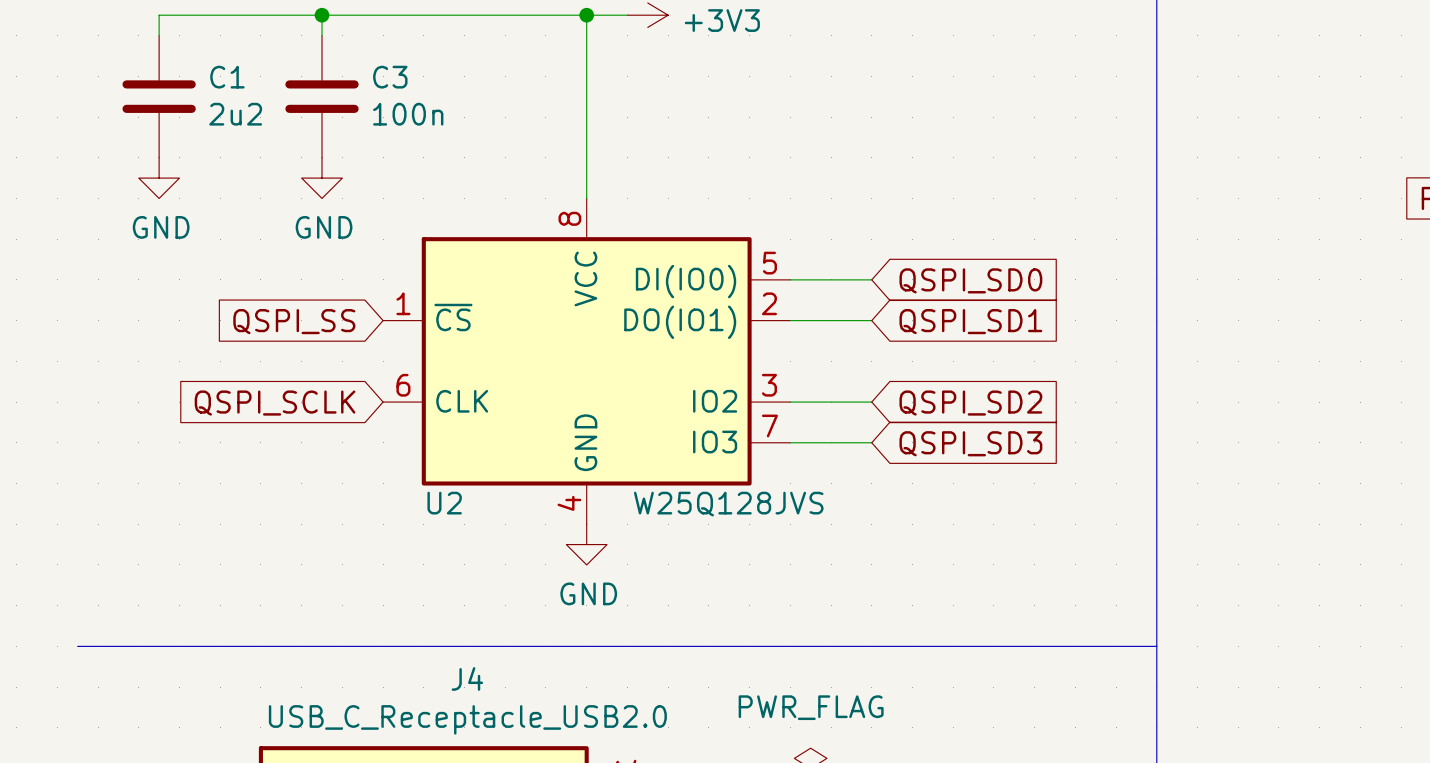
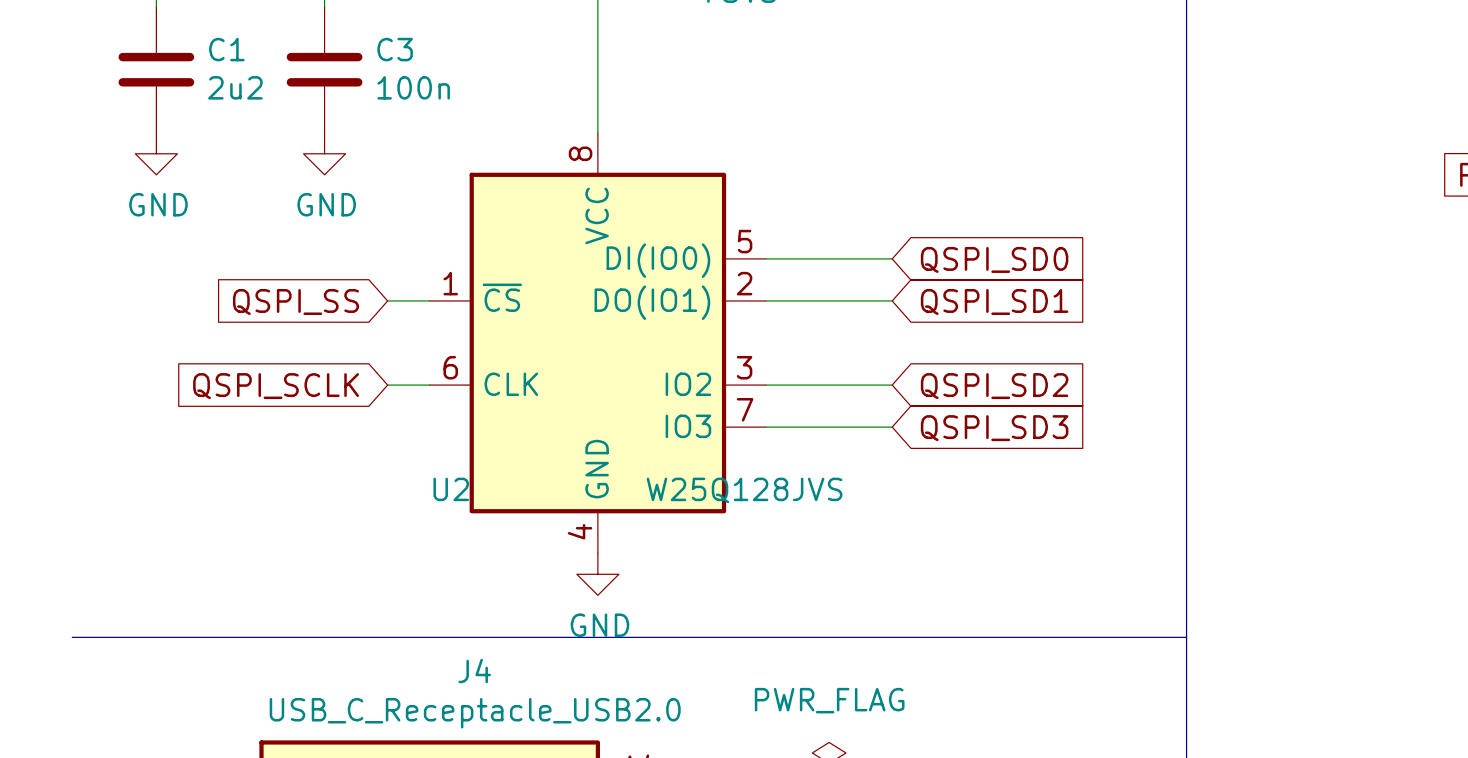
U2 symbol: [383, 198, 791, 525] -> [429, 132, 767, 554]
power symbol position: GND (586, 544) -> GND (597, 574)

